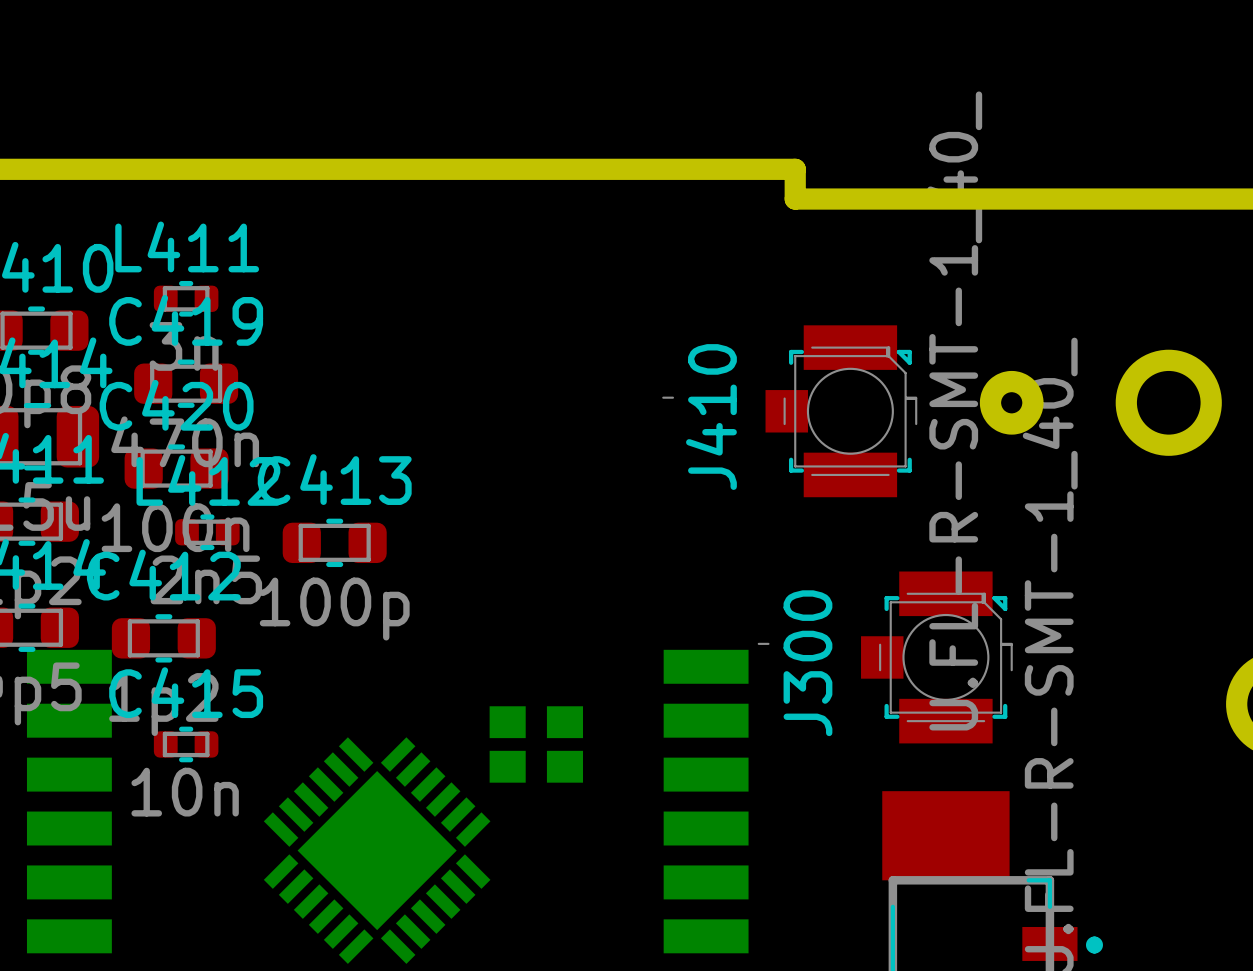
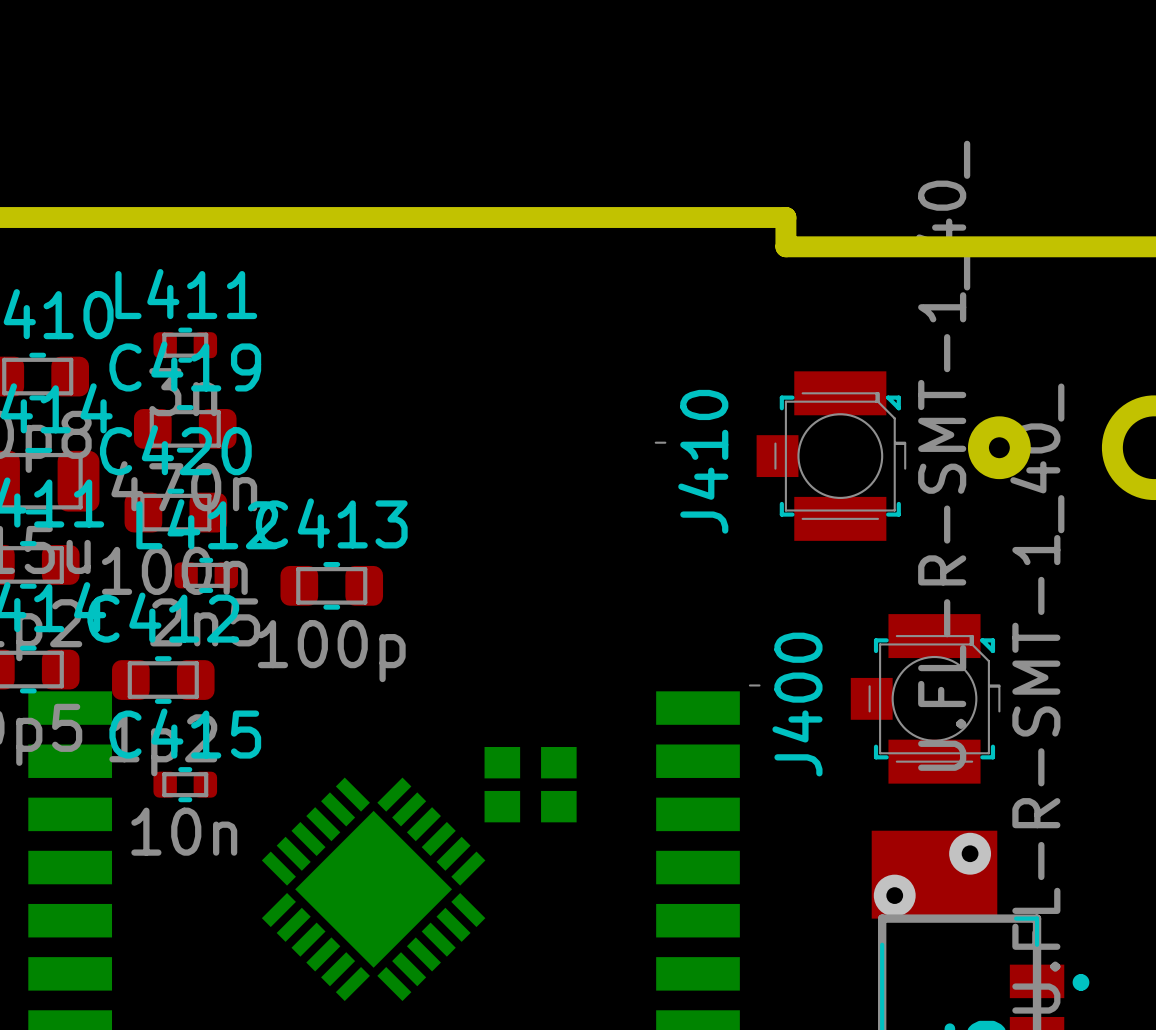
J300 name: J300 (807, 663) -> J400 (797, 704)
via: none -> (970, 853)
via: none -> (894, 895)

